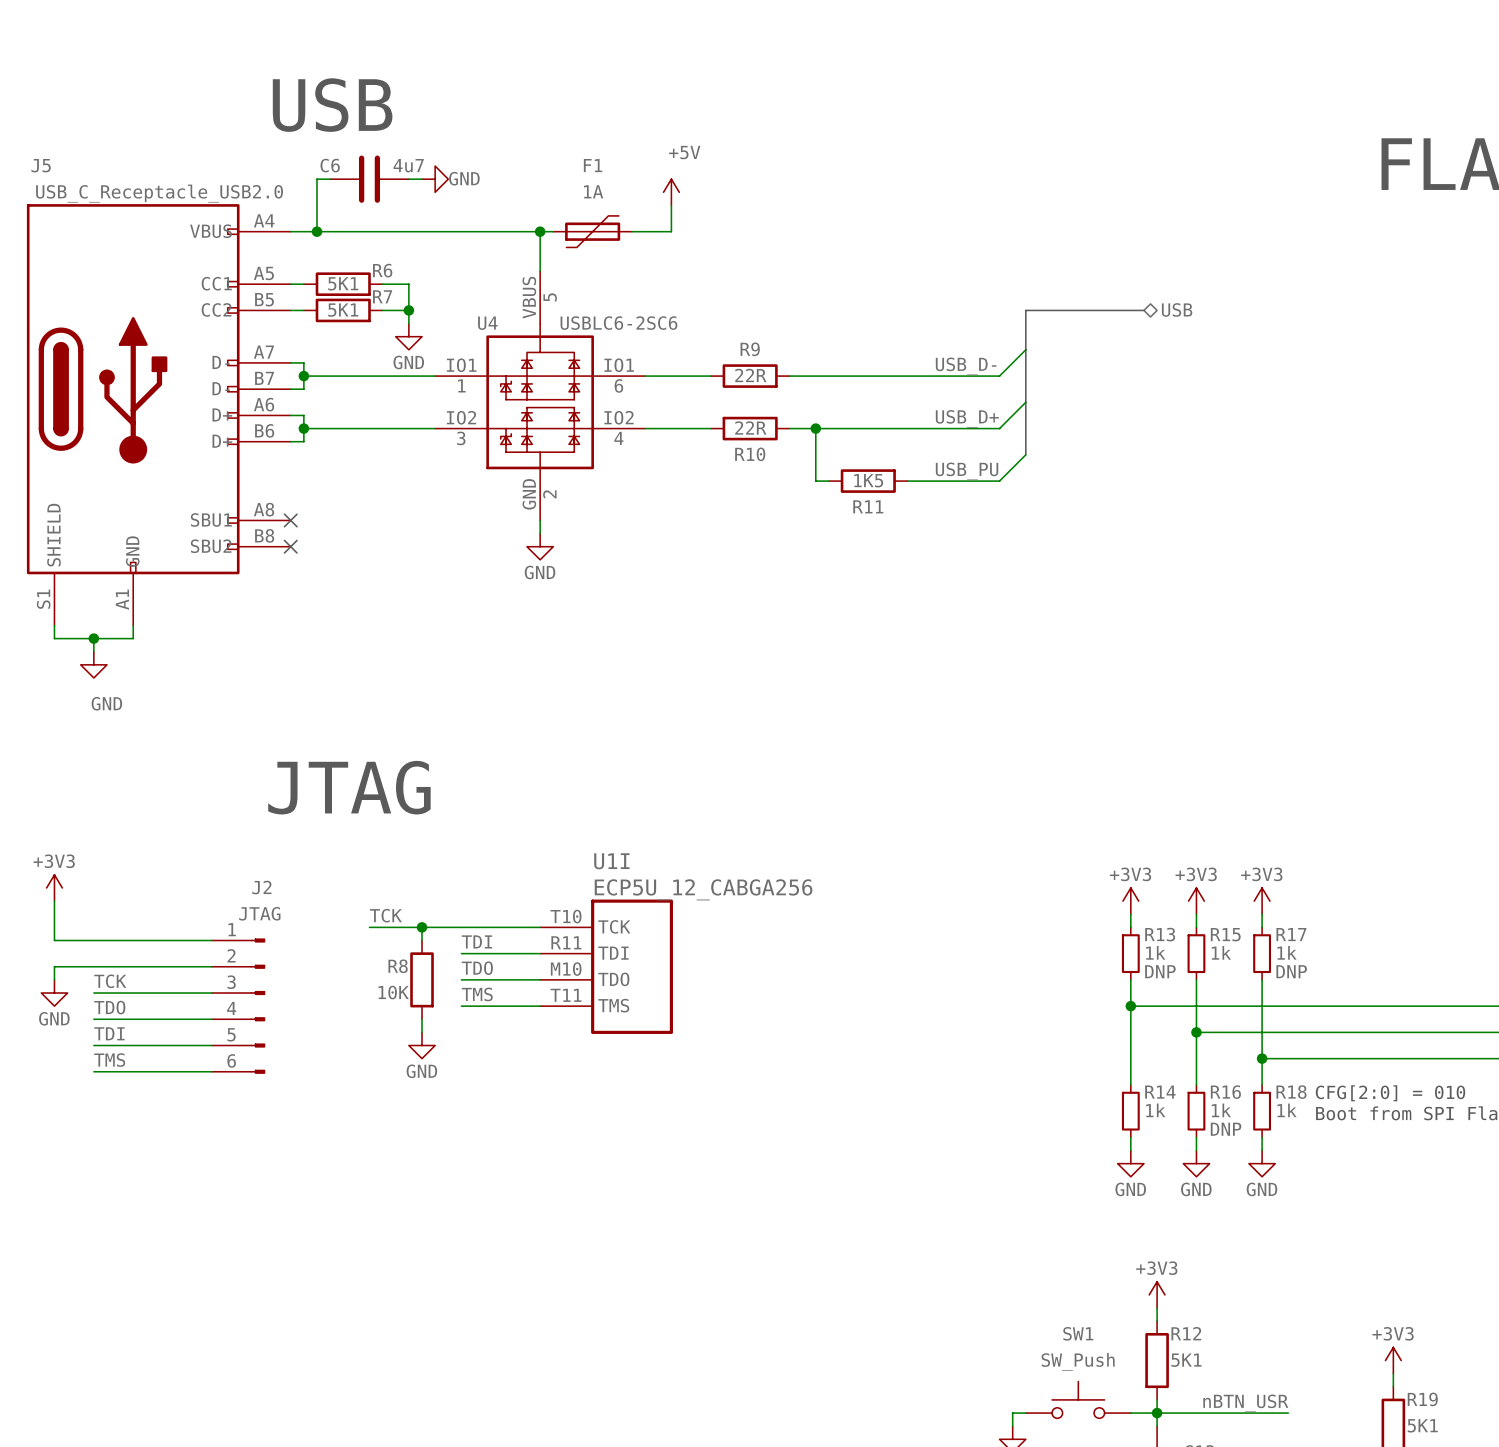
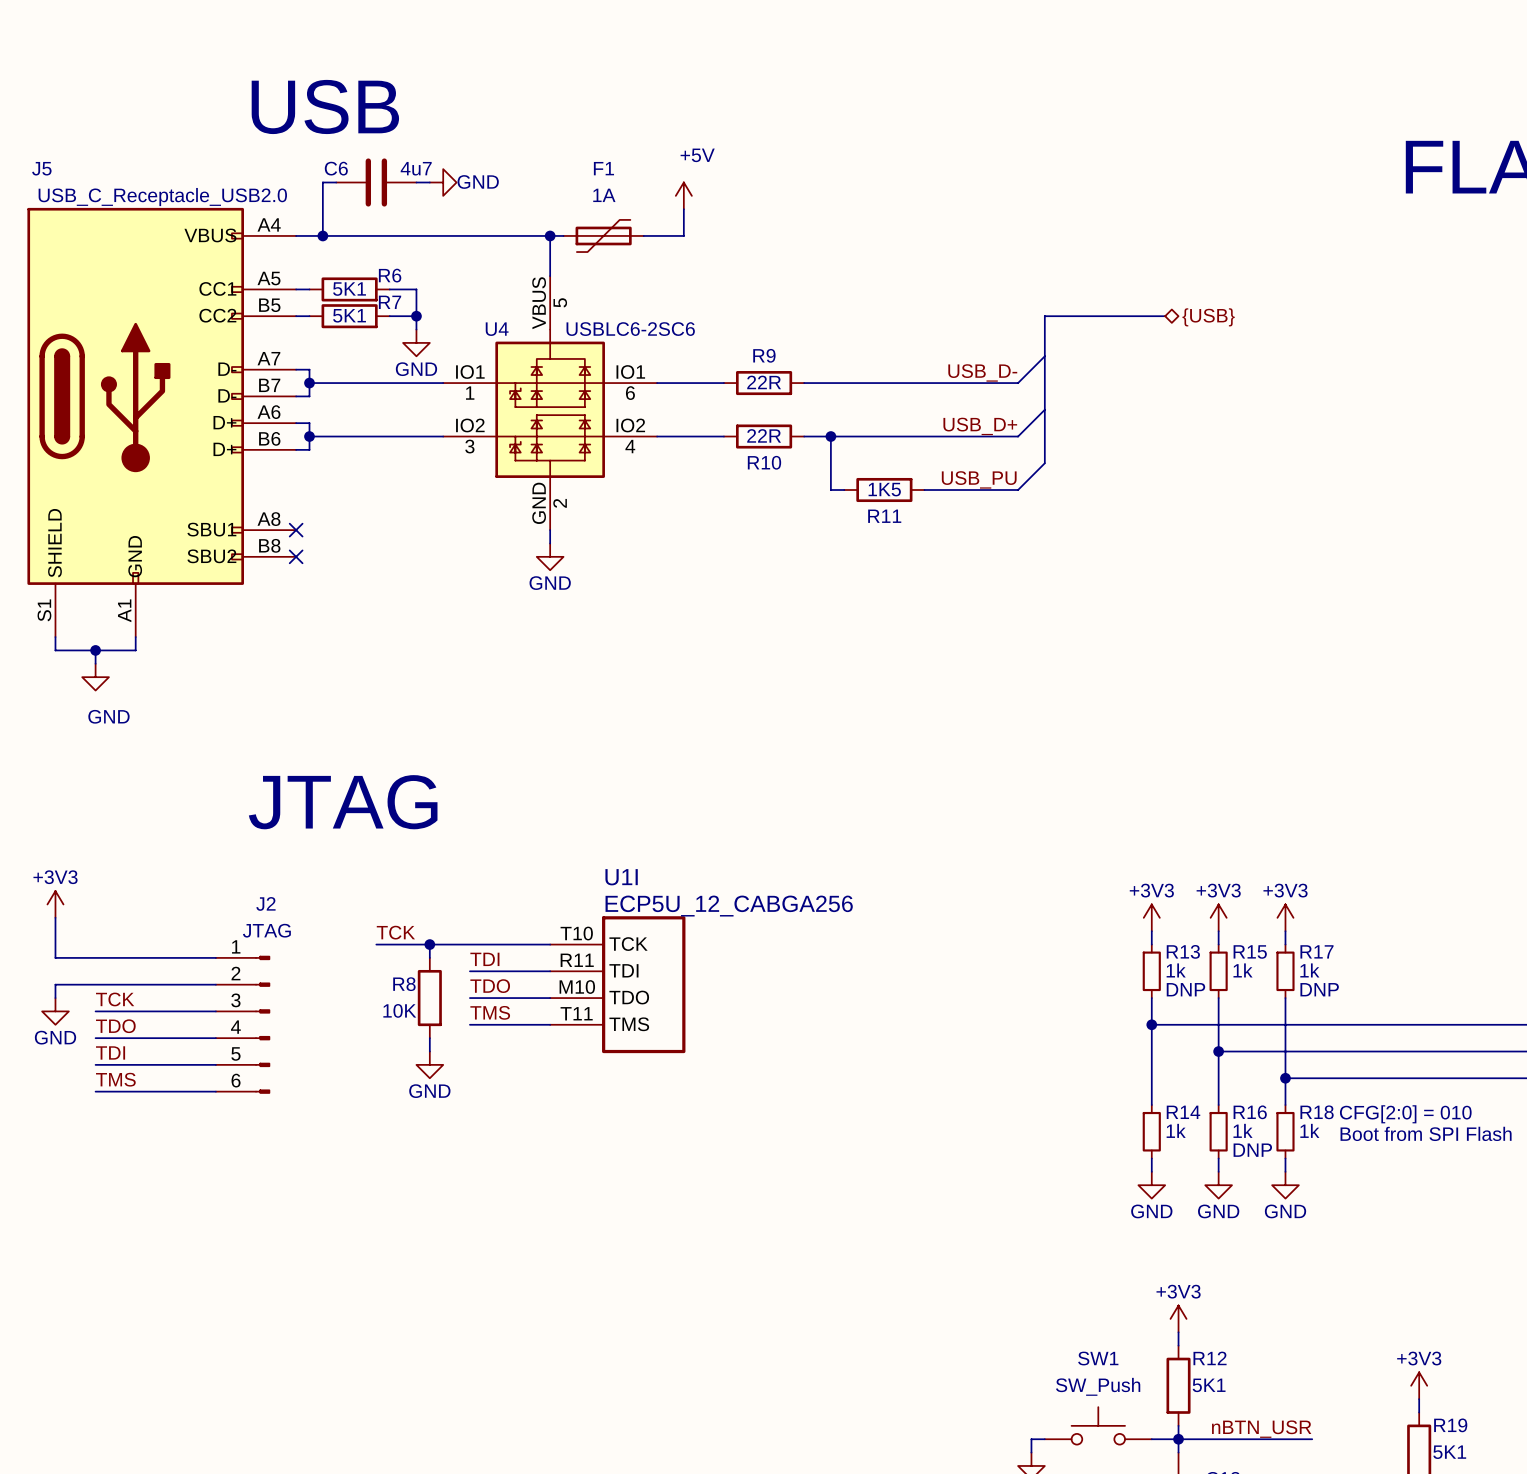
hierarchical label: USB (1177, 309) -> {USB} (1208, 317)

